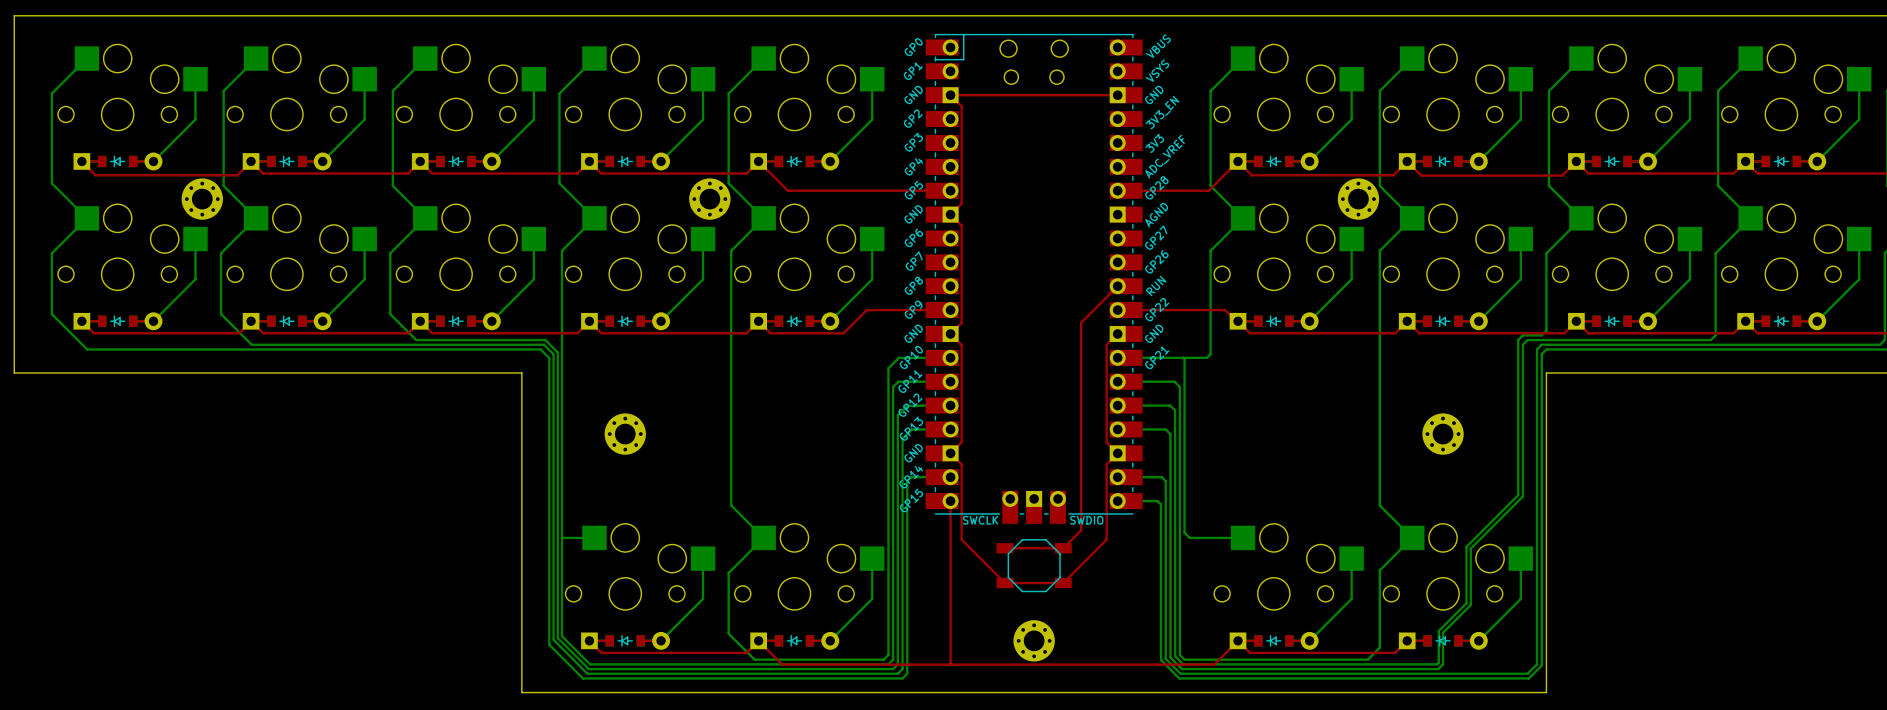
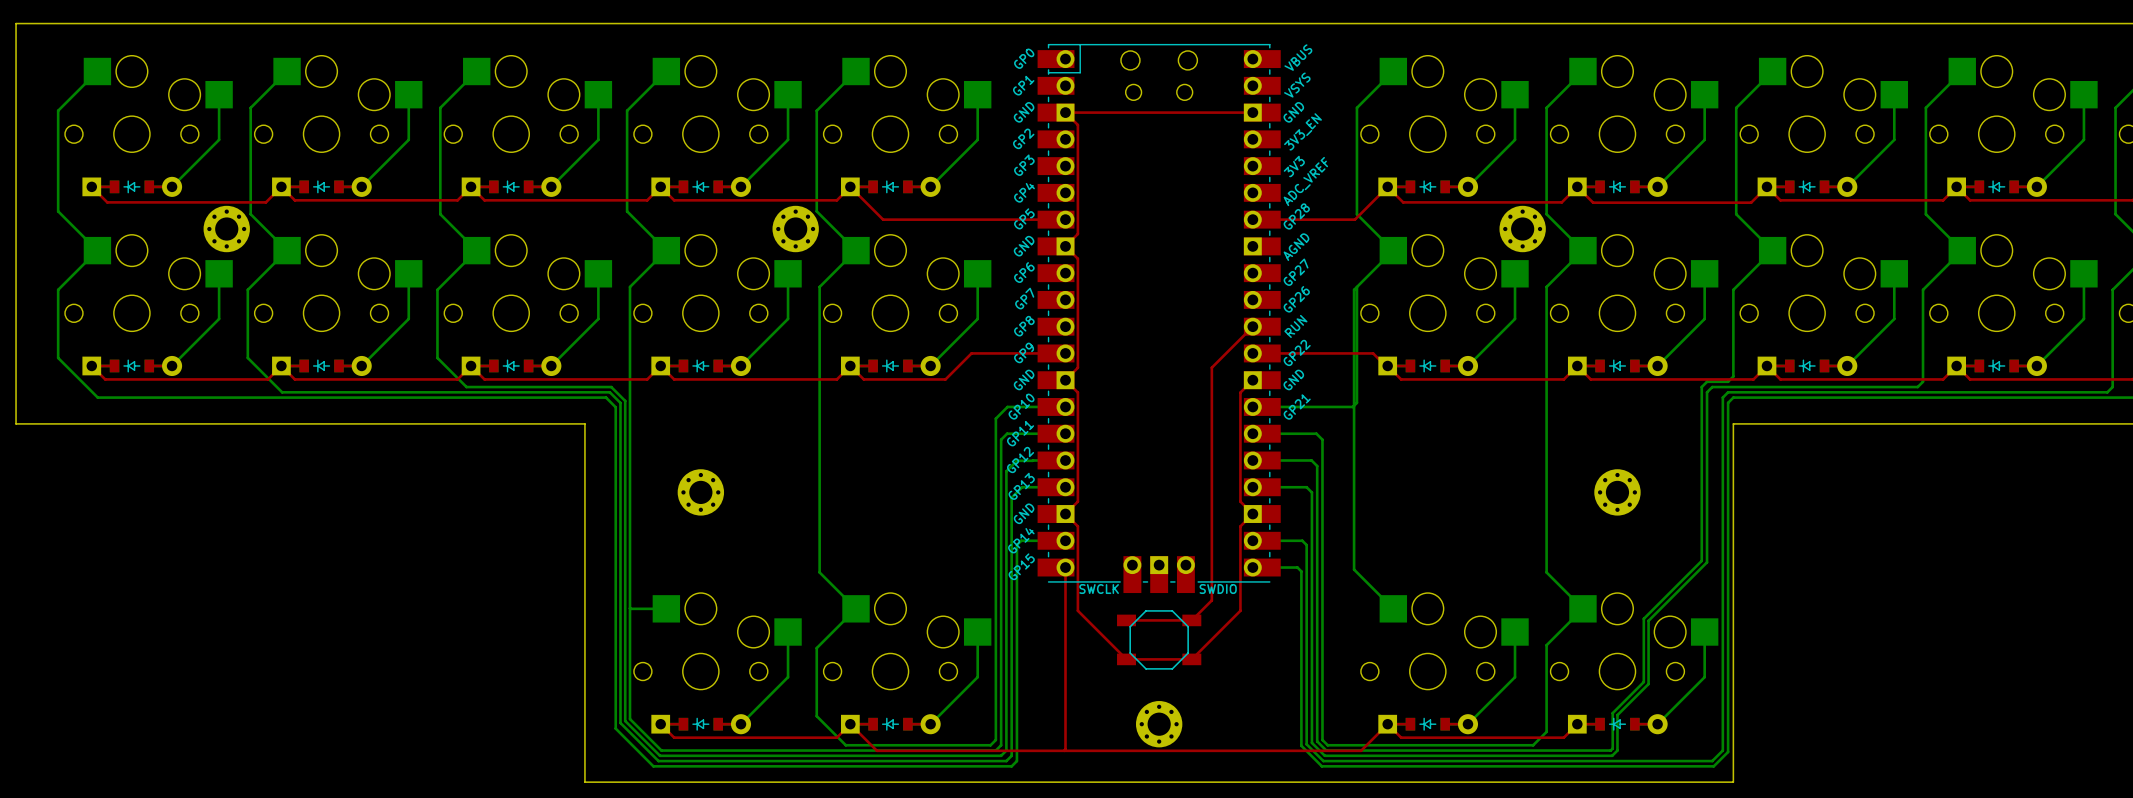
bottom track: (1183, 357) (1184, 532) (1189, 537) (1243, 537) -> (1356, 286) (1354, 289) (1354, 569) (1393, 608)

